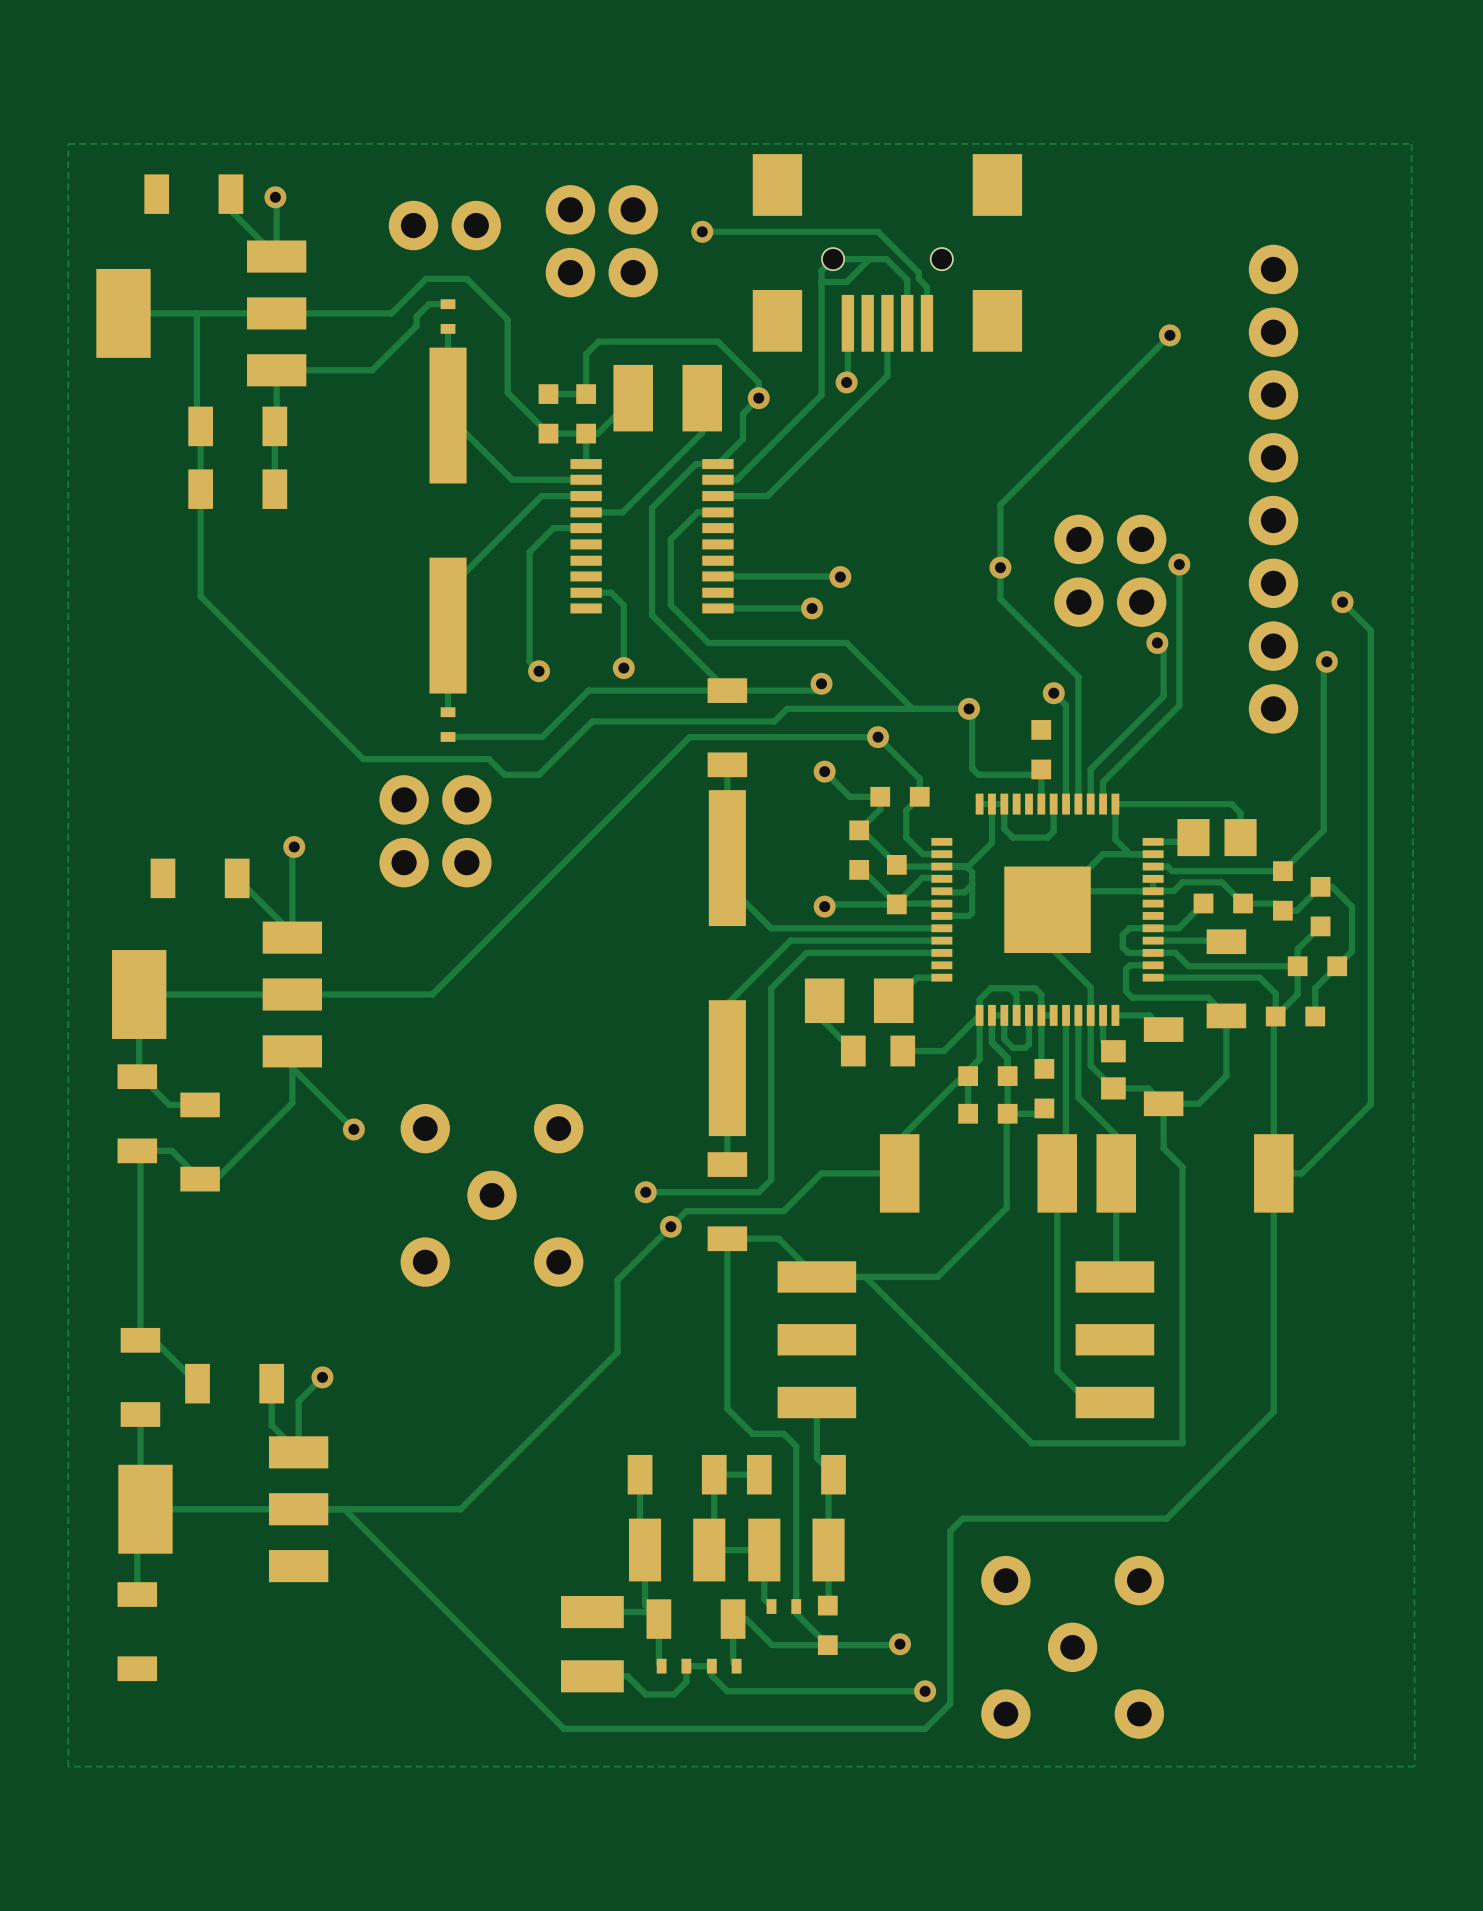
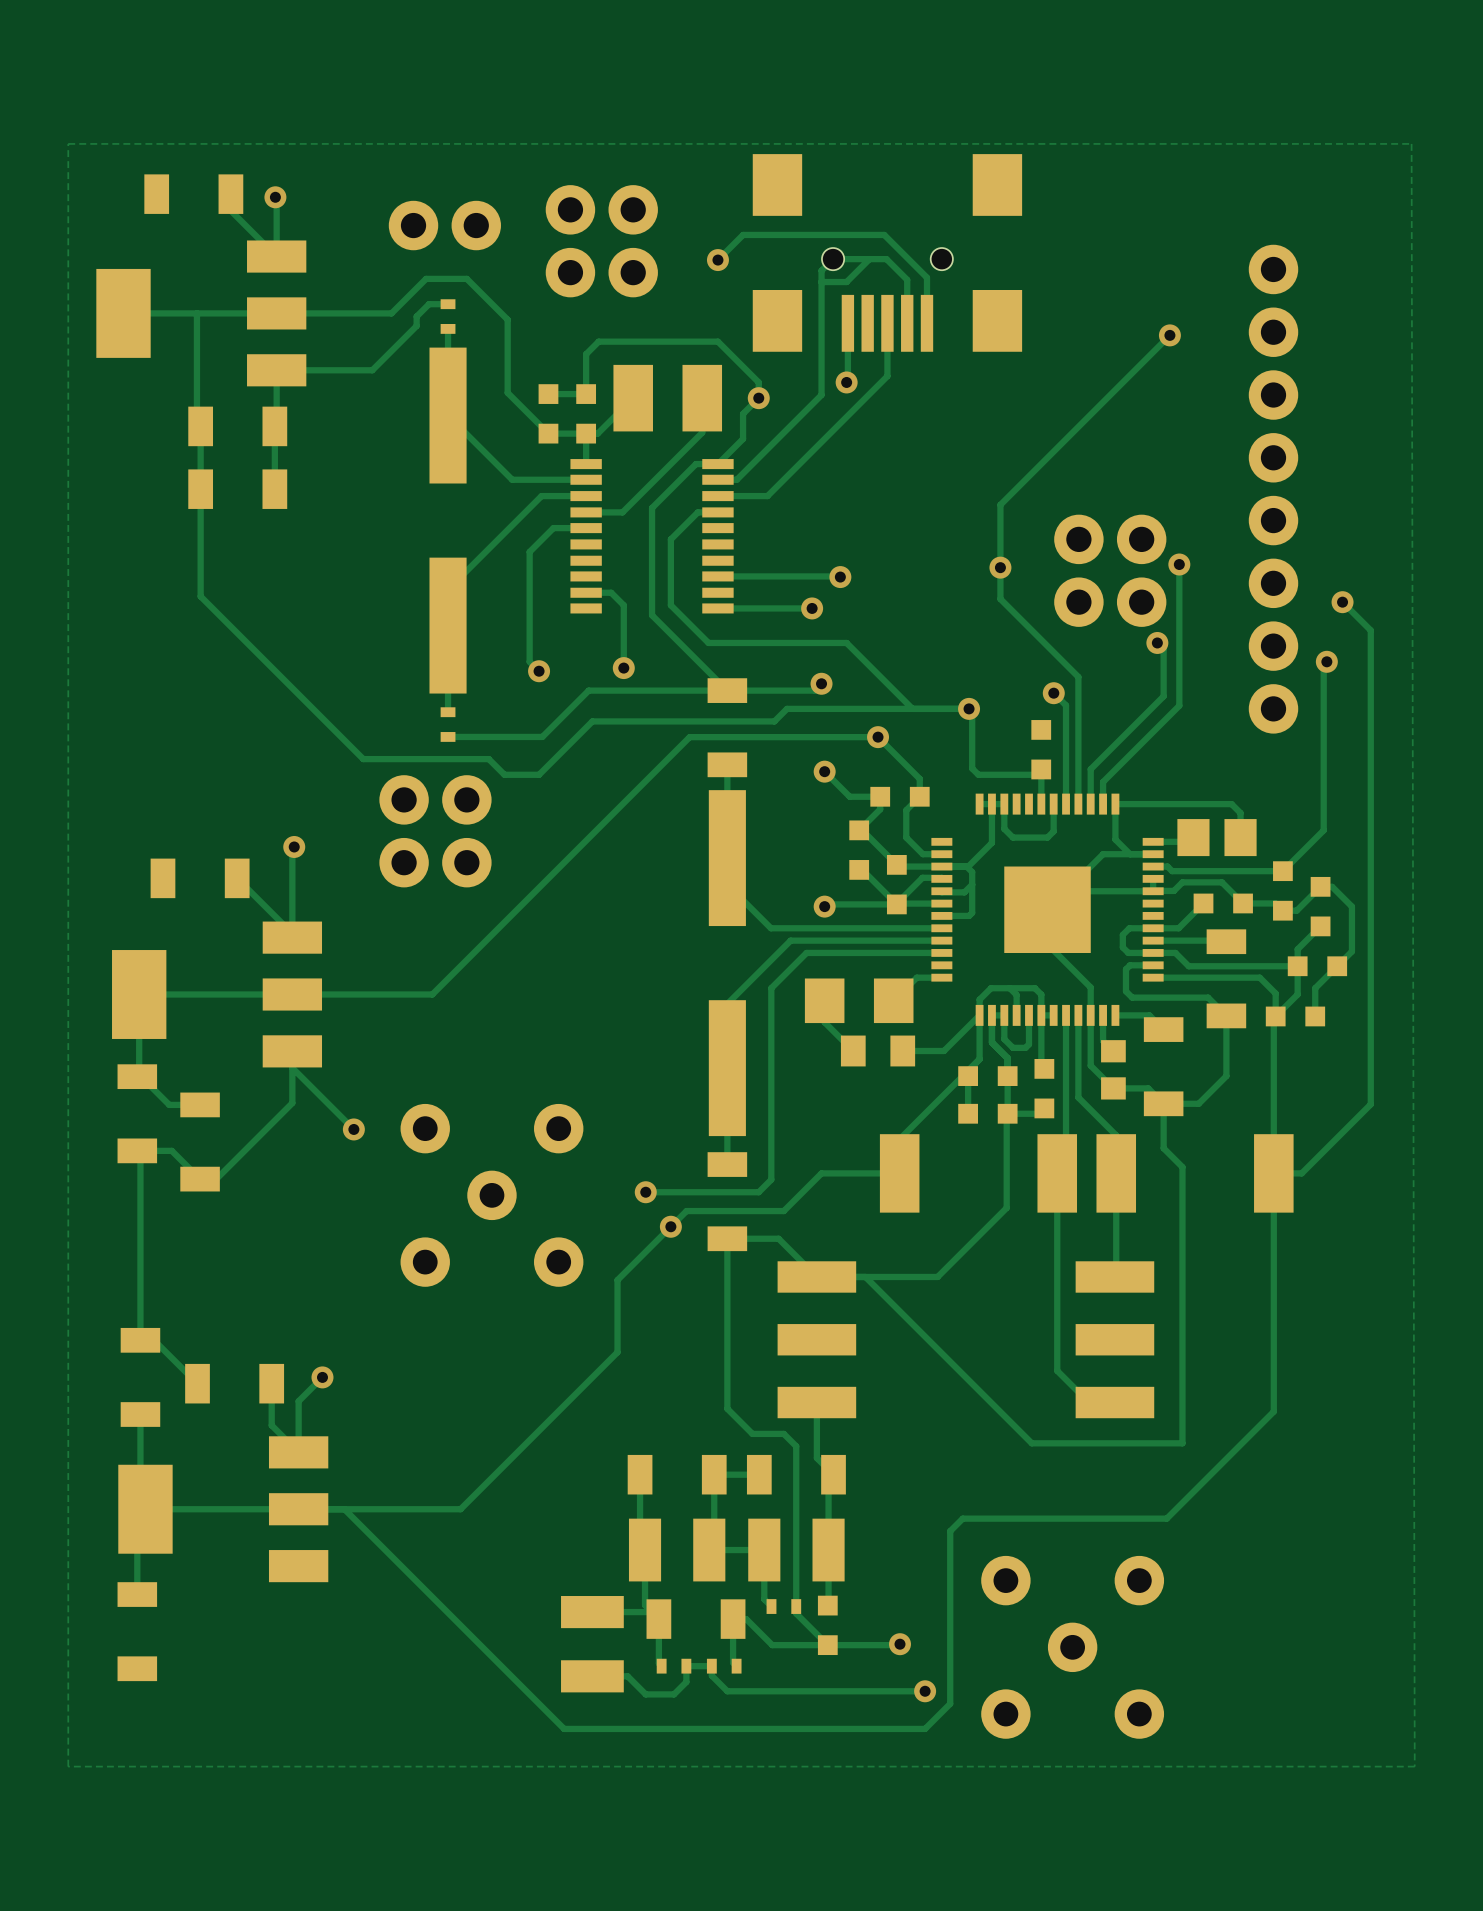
track: (702, 231) (878, 231) (918, 272) (918, 278) (926, 287) -> (717, 260) (743, 234) (884, 234) (926, 277) (926, 287)
via position: (702, 231) -> (717, 260)

